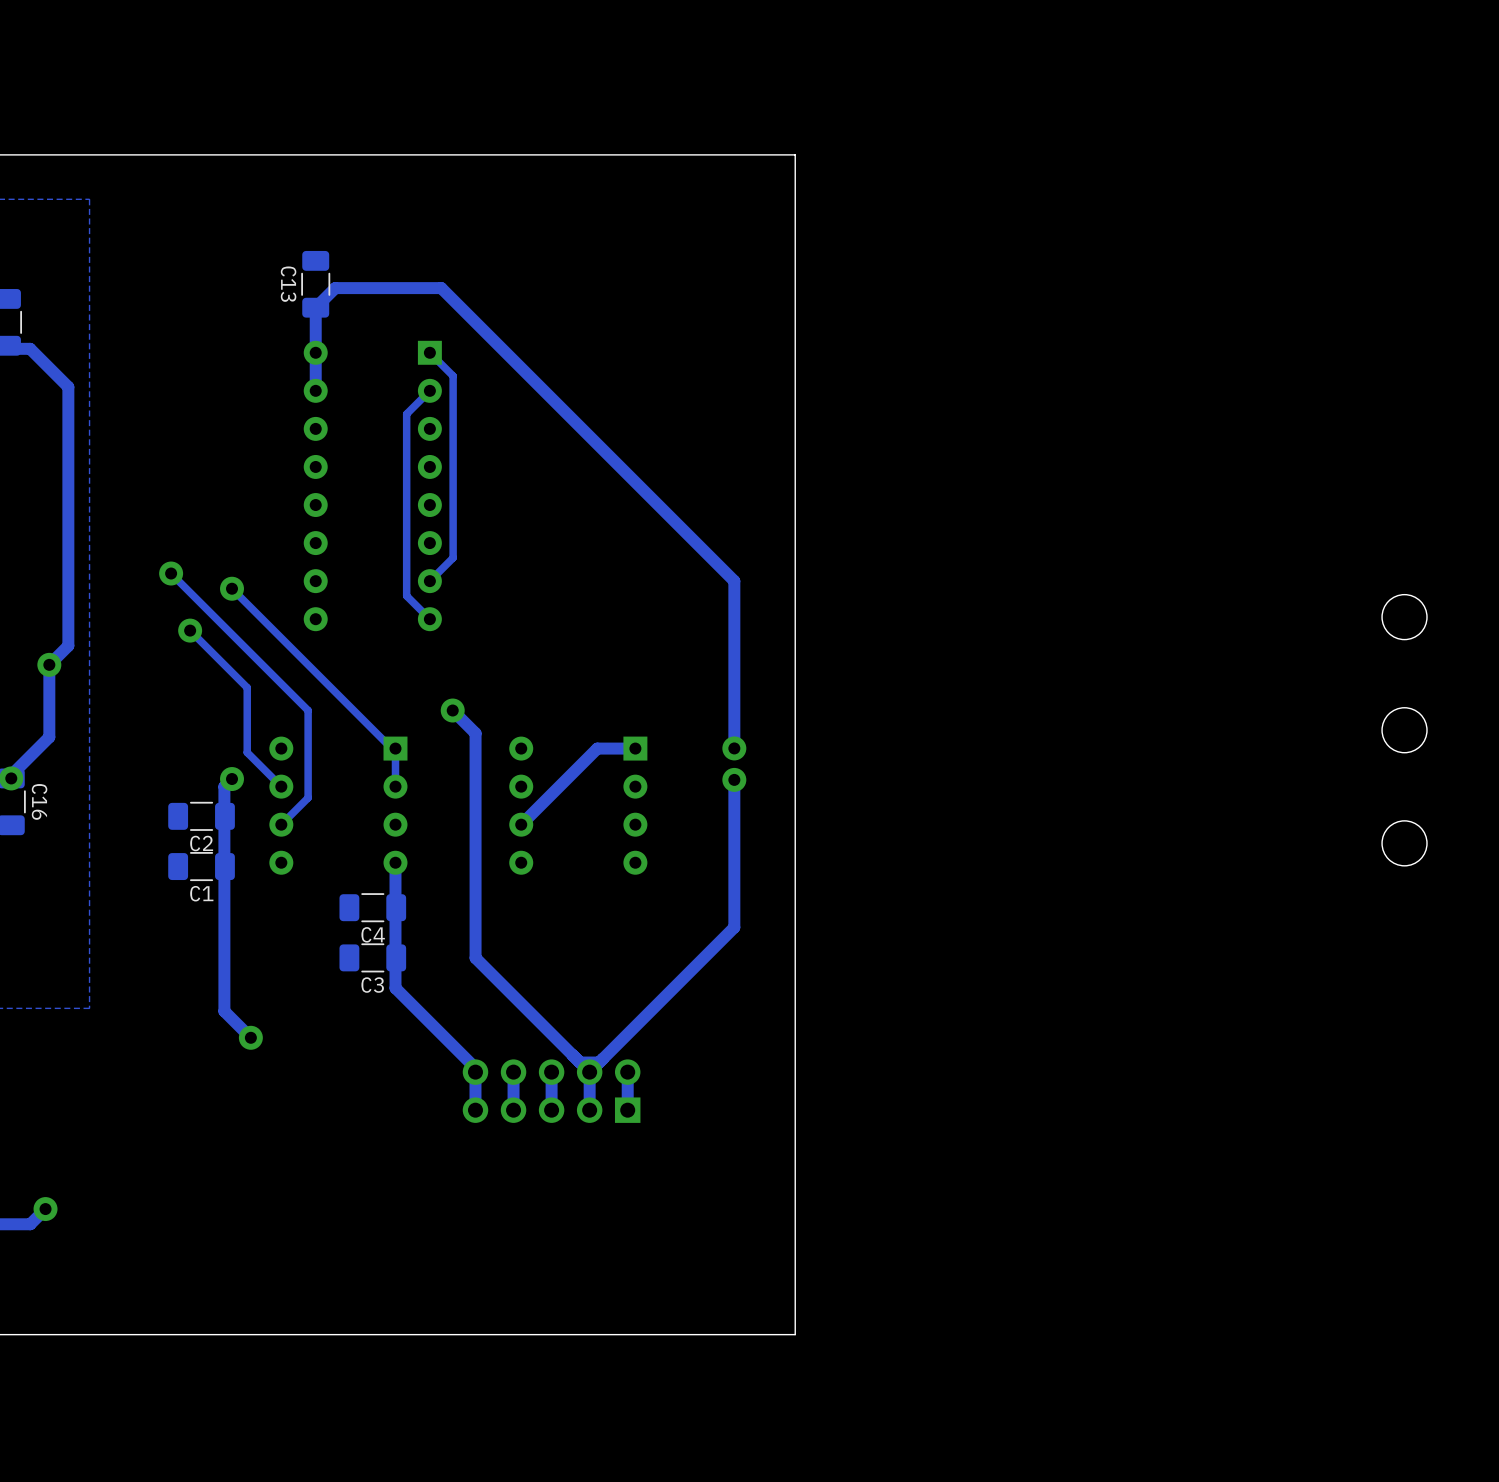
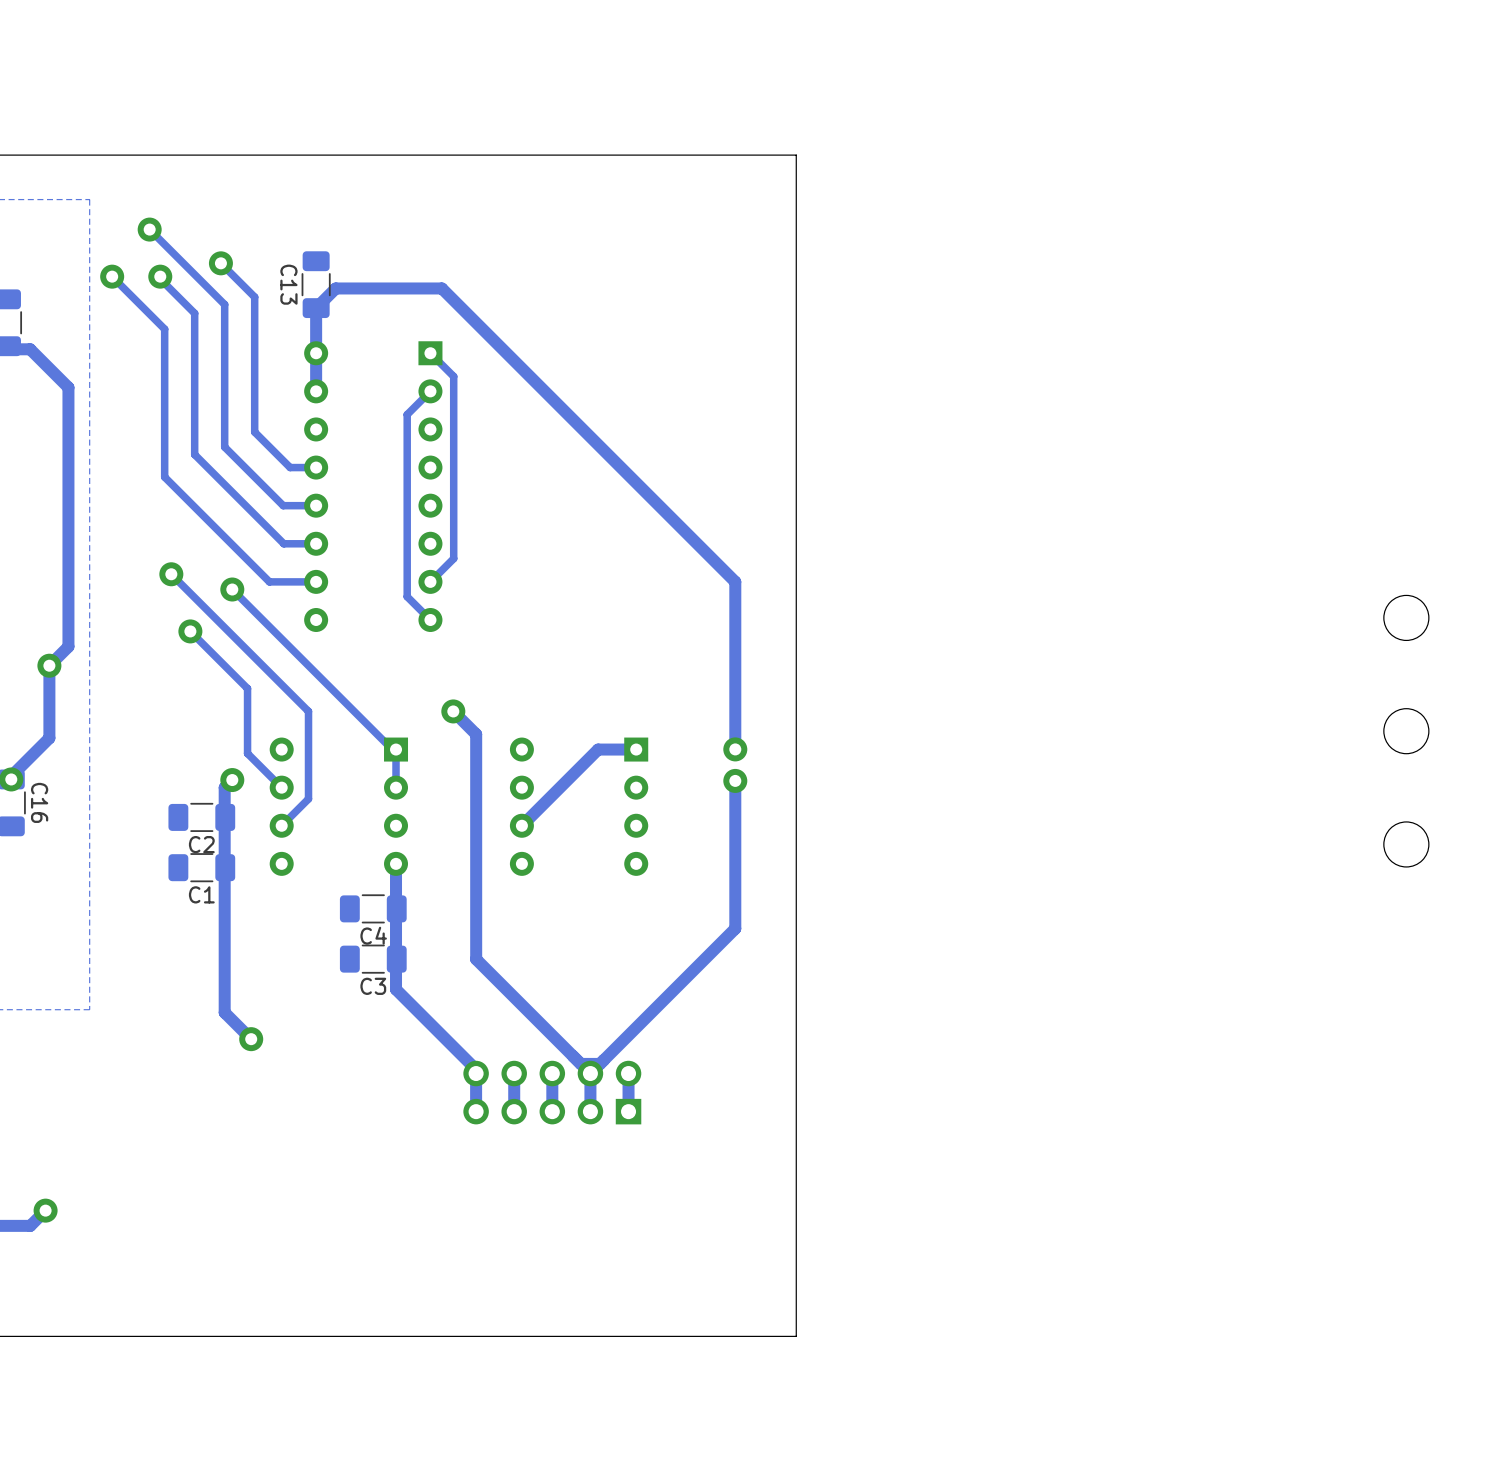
track: none -> (149, 229) (224, 304) (224, 447) (283, 505) (316, 505)
via: none -> (149, 229)
track: none -> (220, 263) (254, 297) (254, 432) (290, 467) (316, 467)
via: none -> (220, 263)
track: none -> (112, 276) (164, 329) (164, 477) (269, 581) (316, 581)
via: none -> (112, 276)
track: none -> (160, 276) (160, 278) (194, 313) (194, 454) (283, 543) (316, 543)
via: none -> (160, 276)

